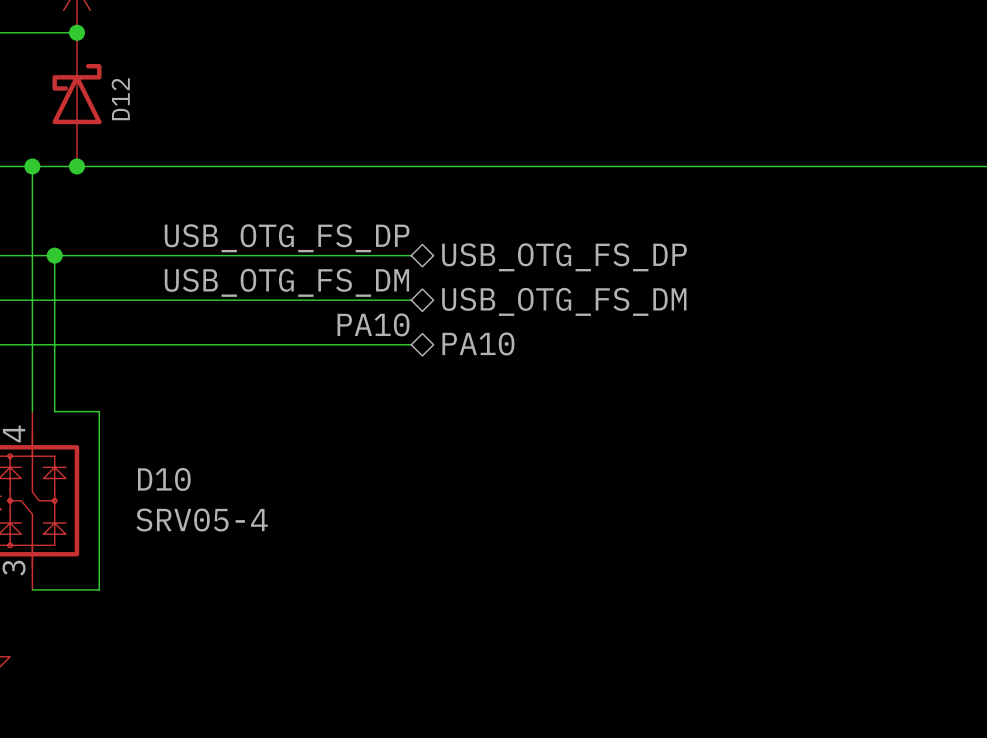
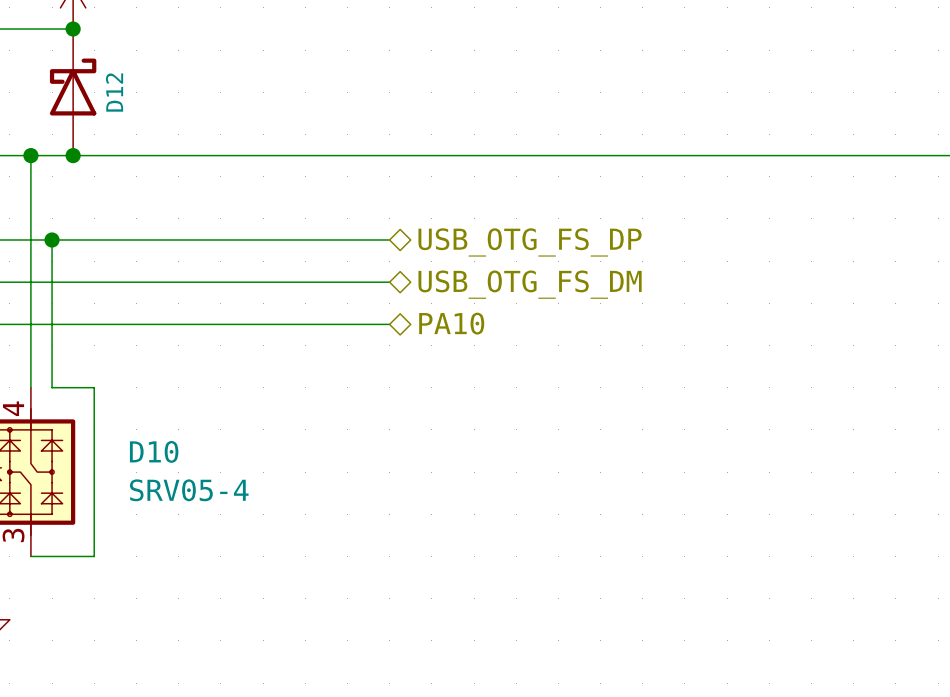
label: USB_OTG_FS_DP (287, 238) -> none
label: USB_OTG_FS_DM (286, 282) -> none
label: PA10 (373, 324) -> none

